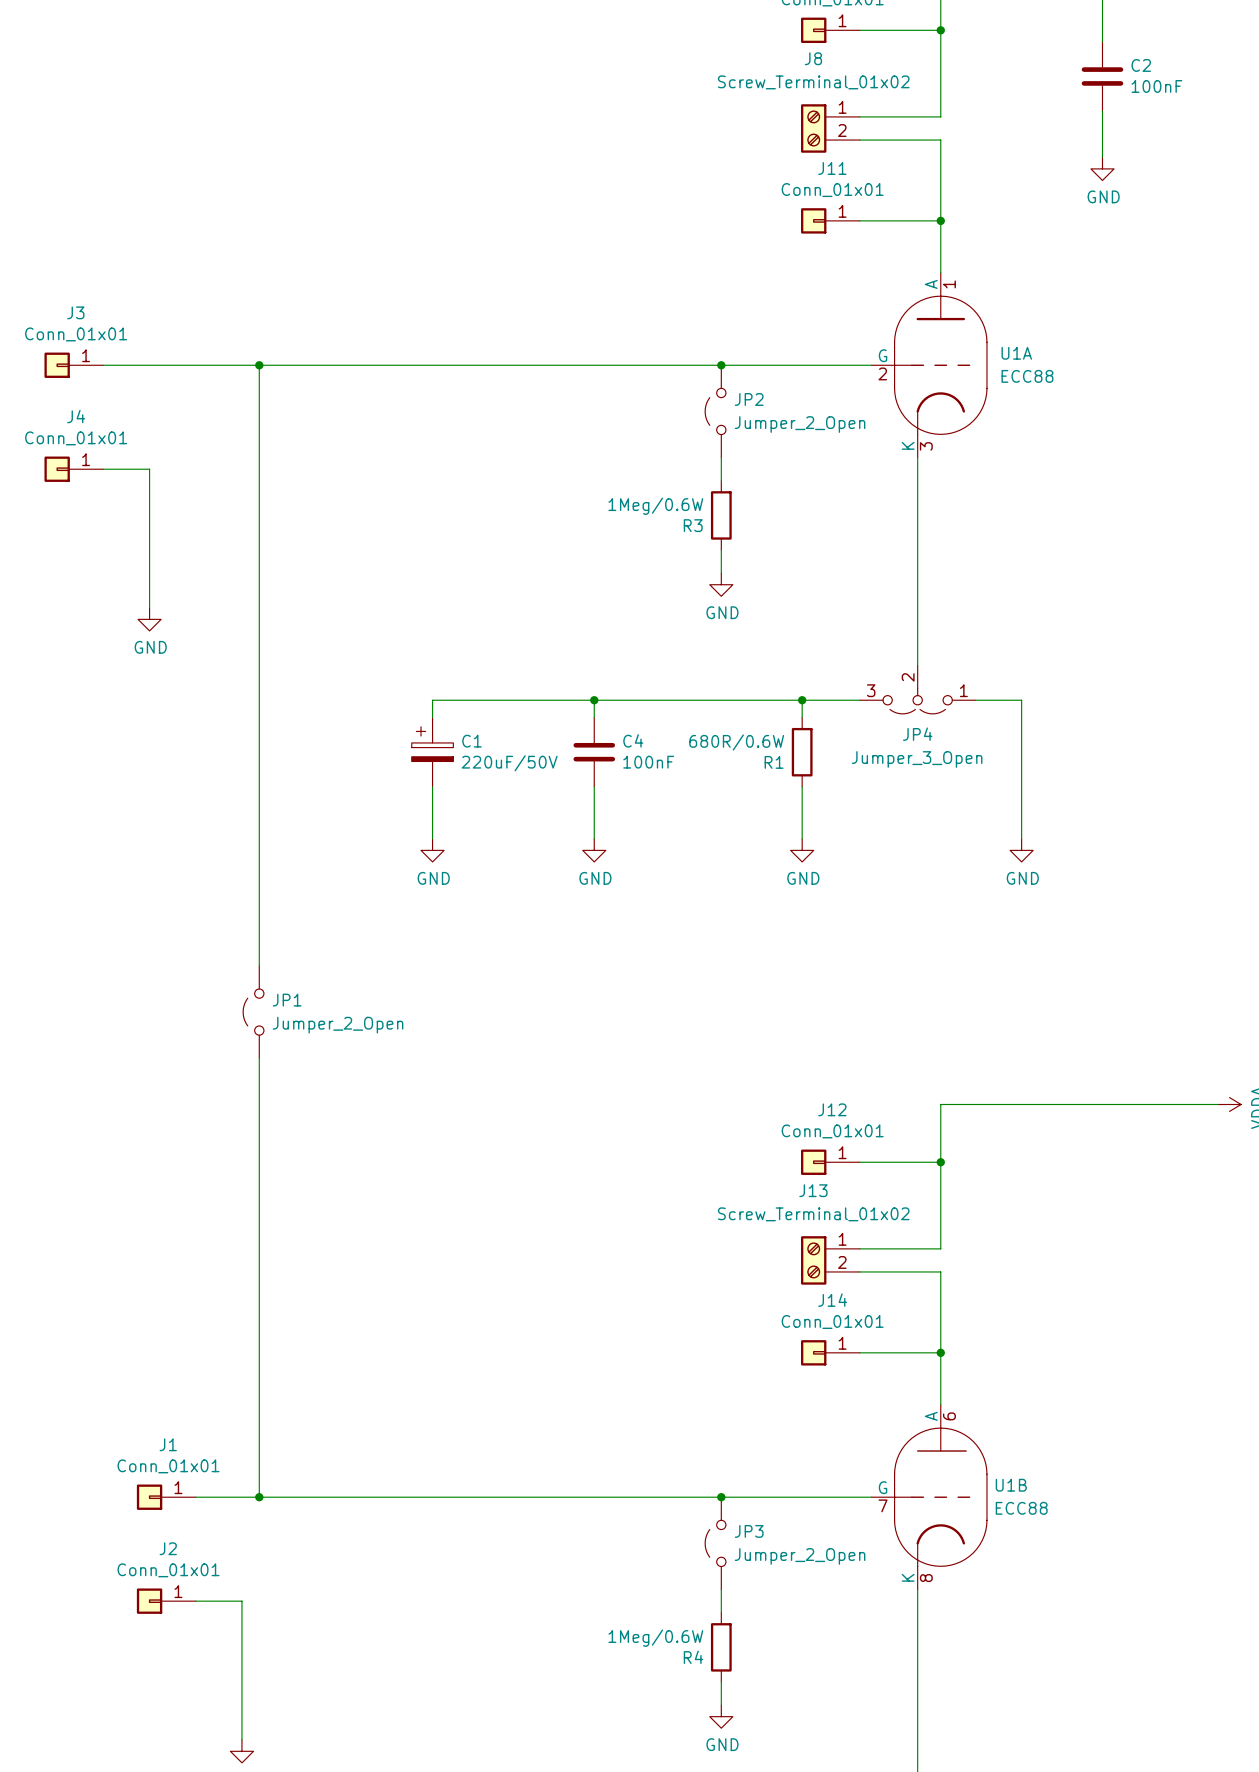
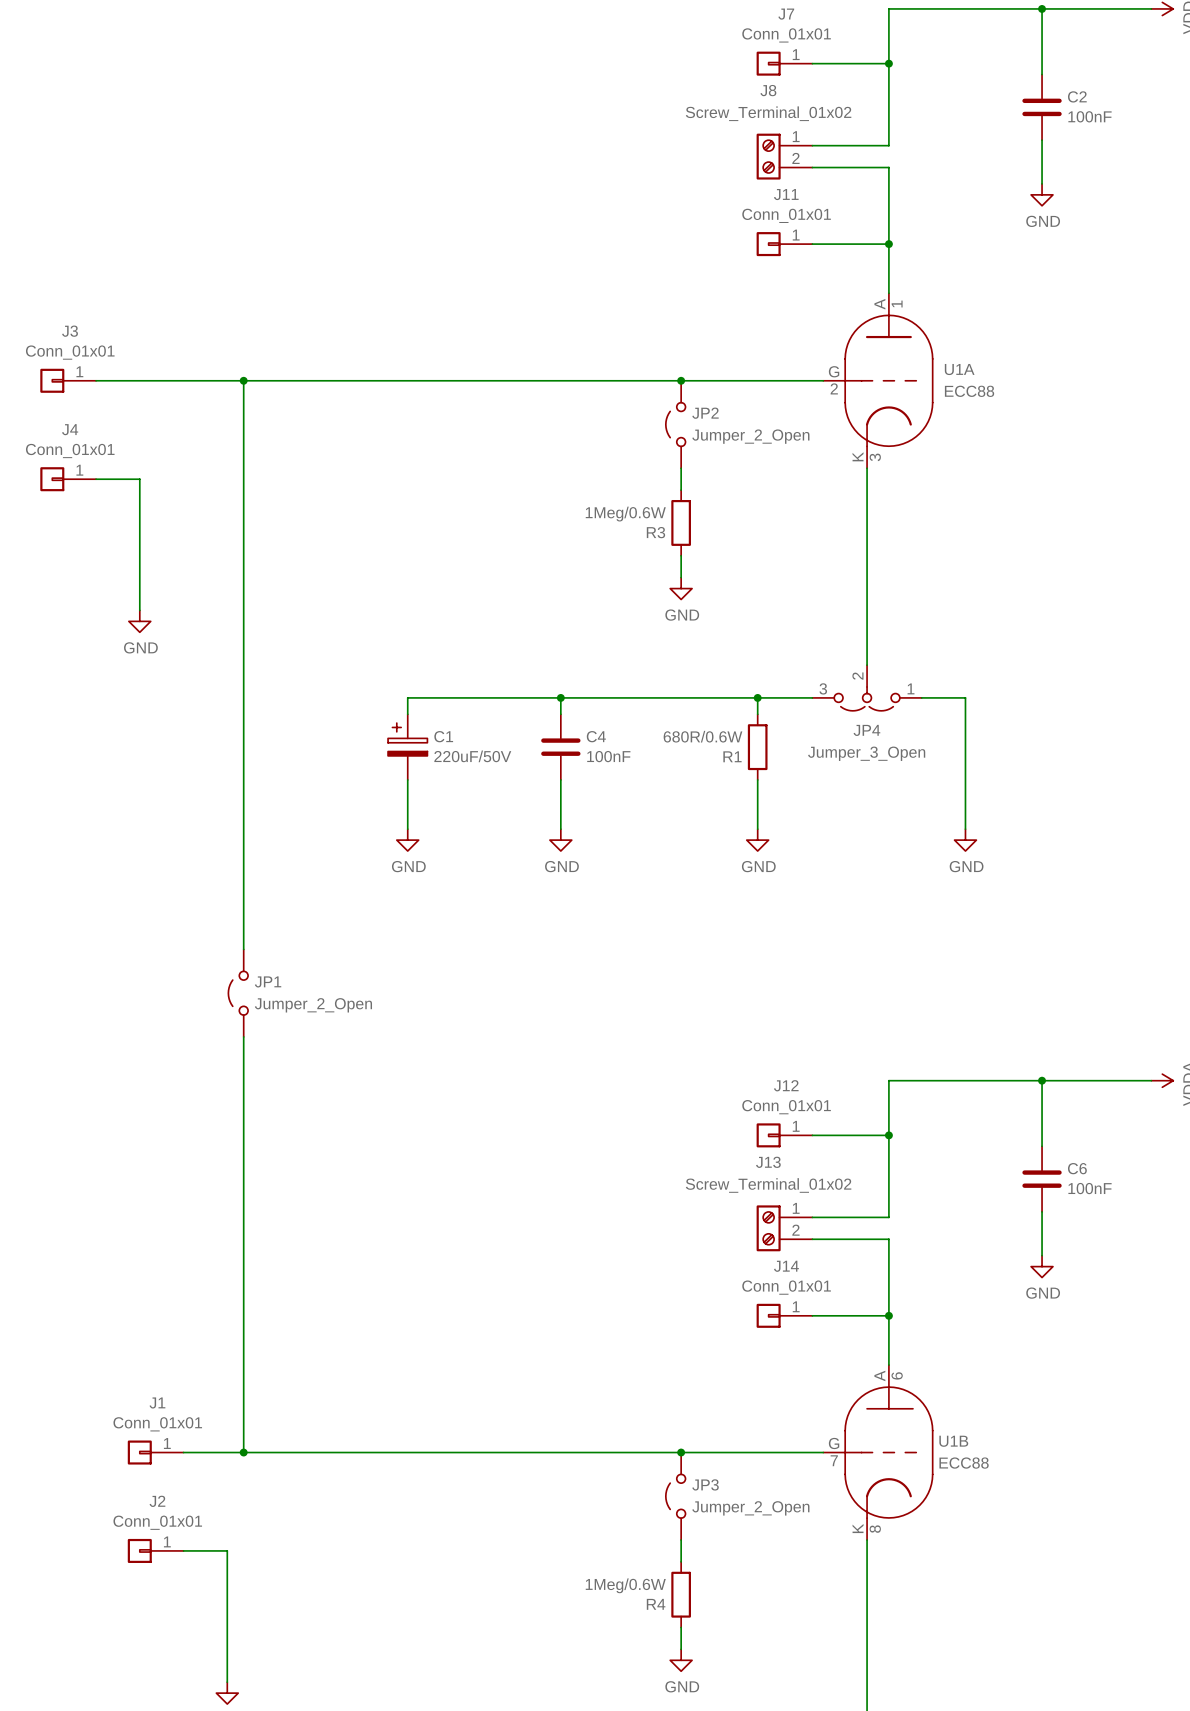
wire: none -> (1042, 1080) (1042, 1146)
junction: none -> (1042, 1080)
C6: none -> 100nF (1042, 1179)
wire: none -> (1042, 1211) (1042, 1255)
power symbol: none -> GND (1042, 1266)

